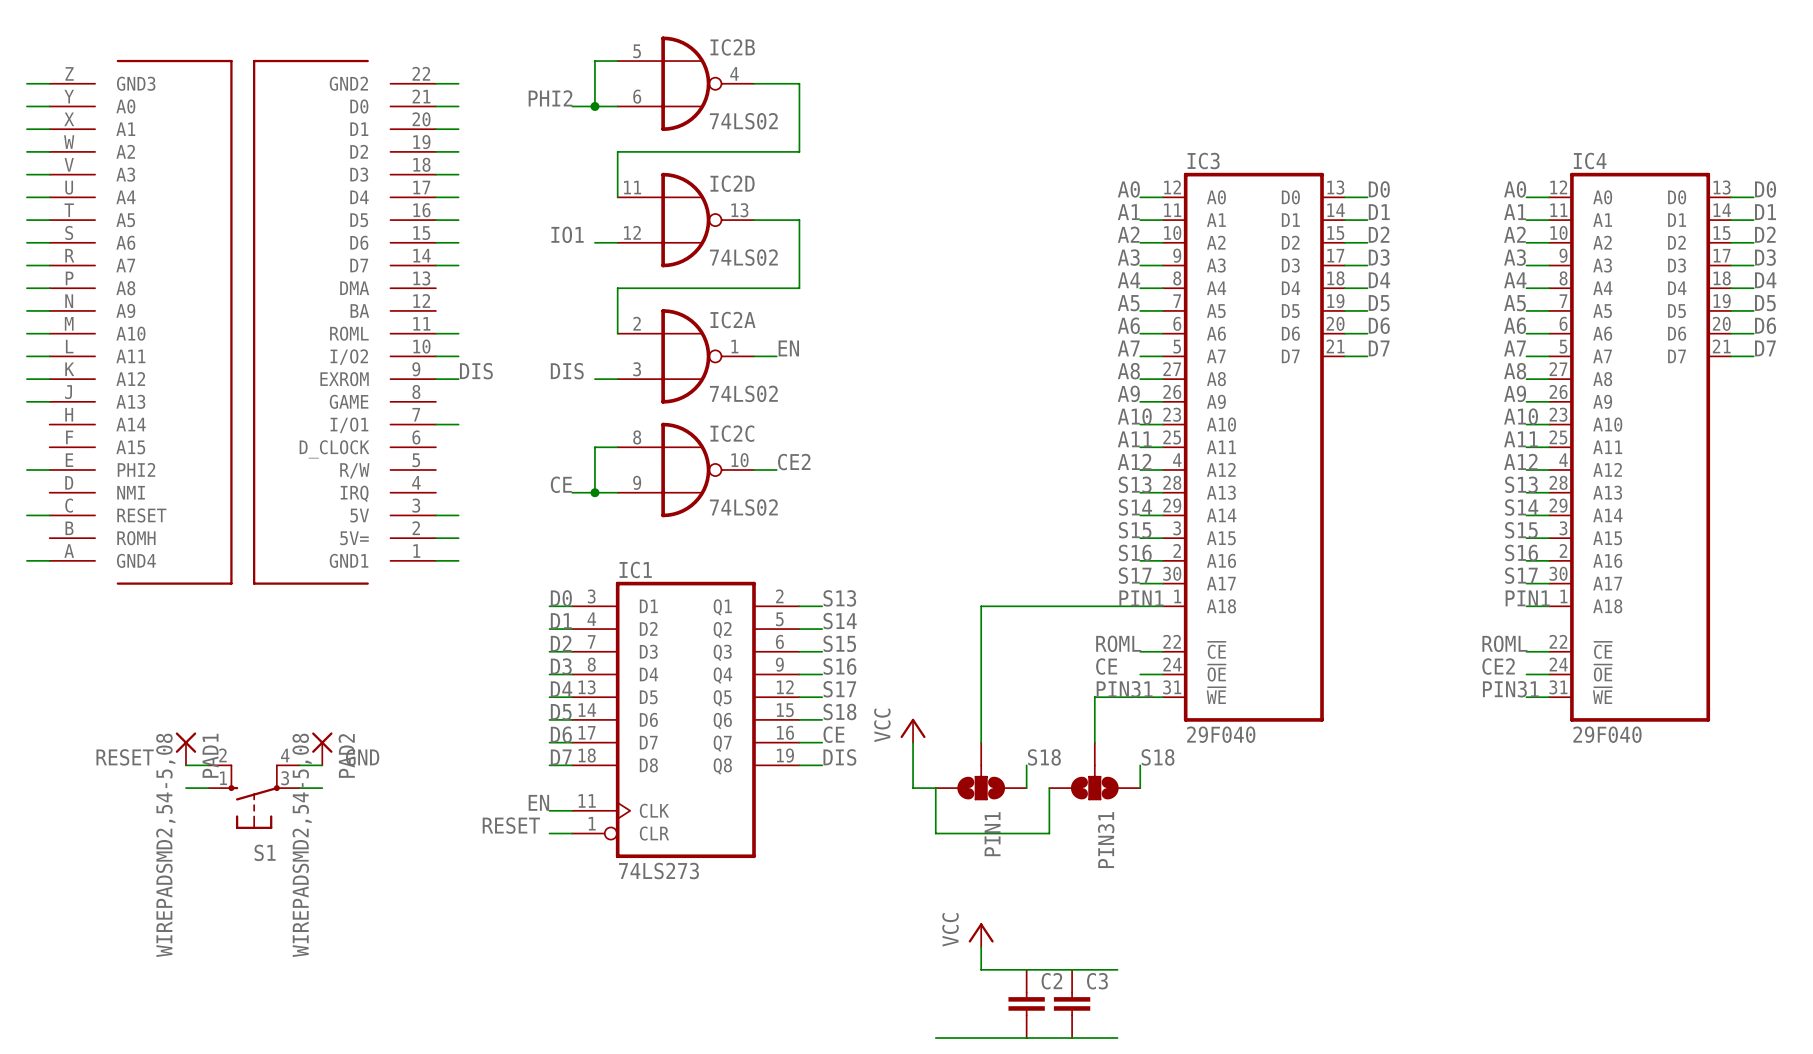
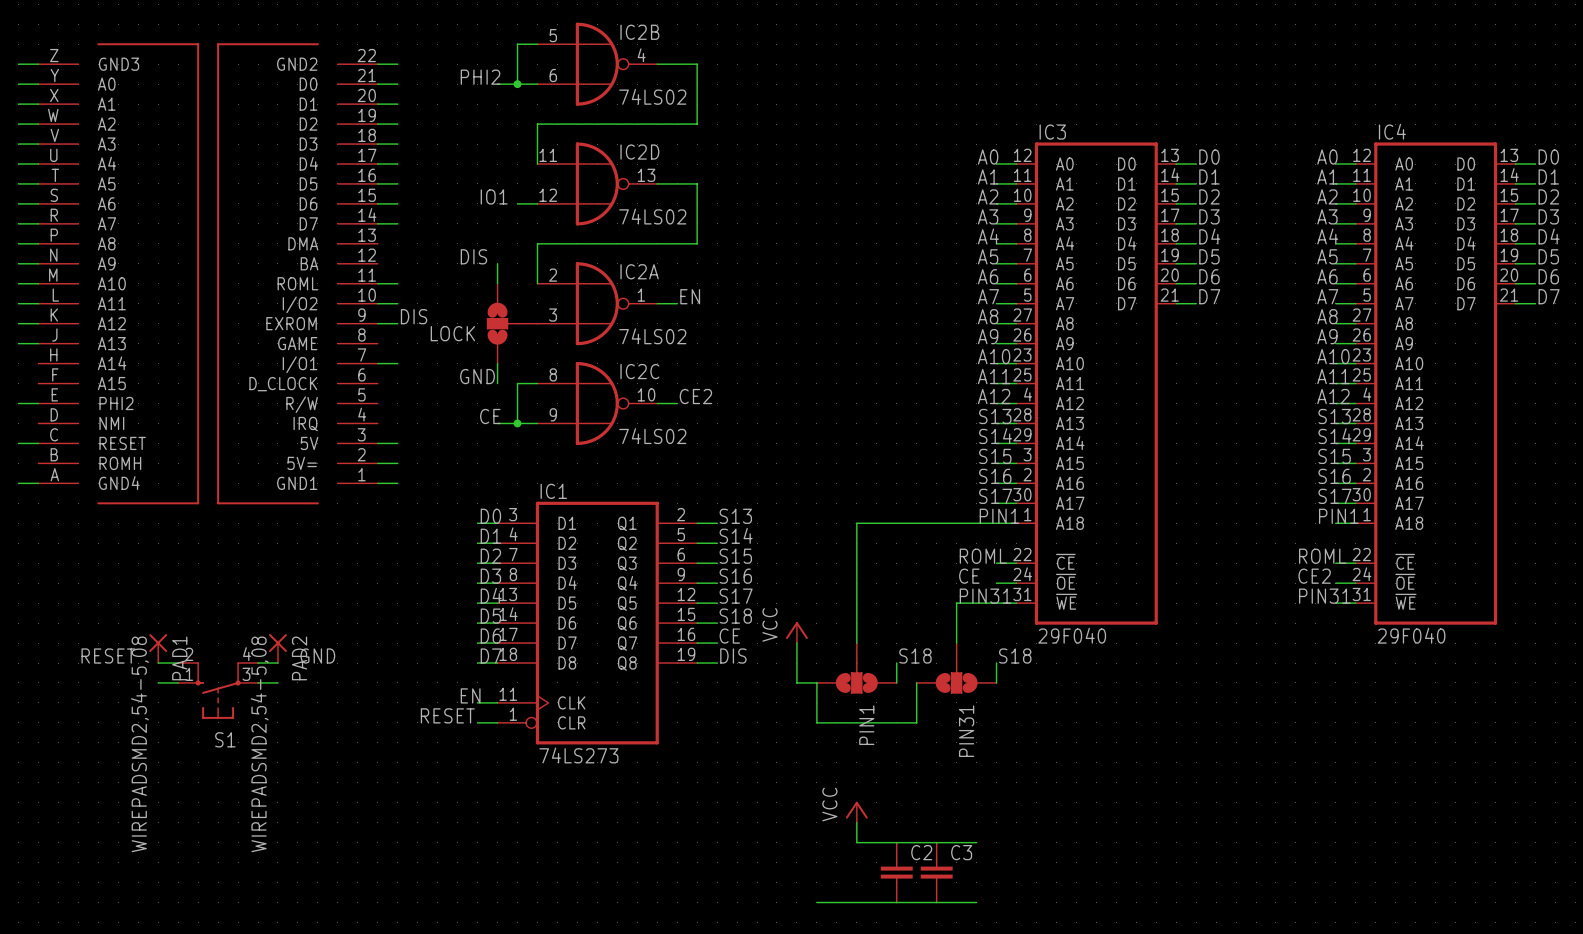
wire: none -> (497, 263) (497, 283)
label position: DIS (567, 371) -> DIS (473, 256)
LOCK: none -> (512, 323)
wire: none -> (497, 363) (497, 383)
label: none -> GND (477, 376)

